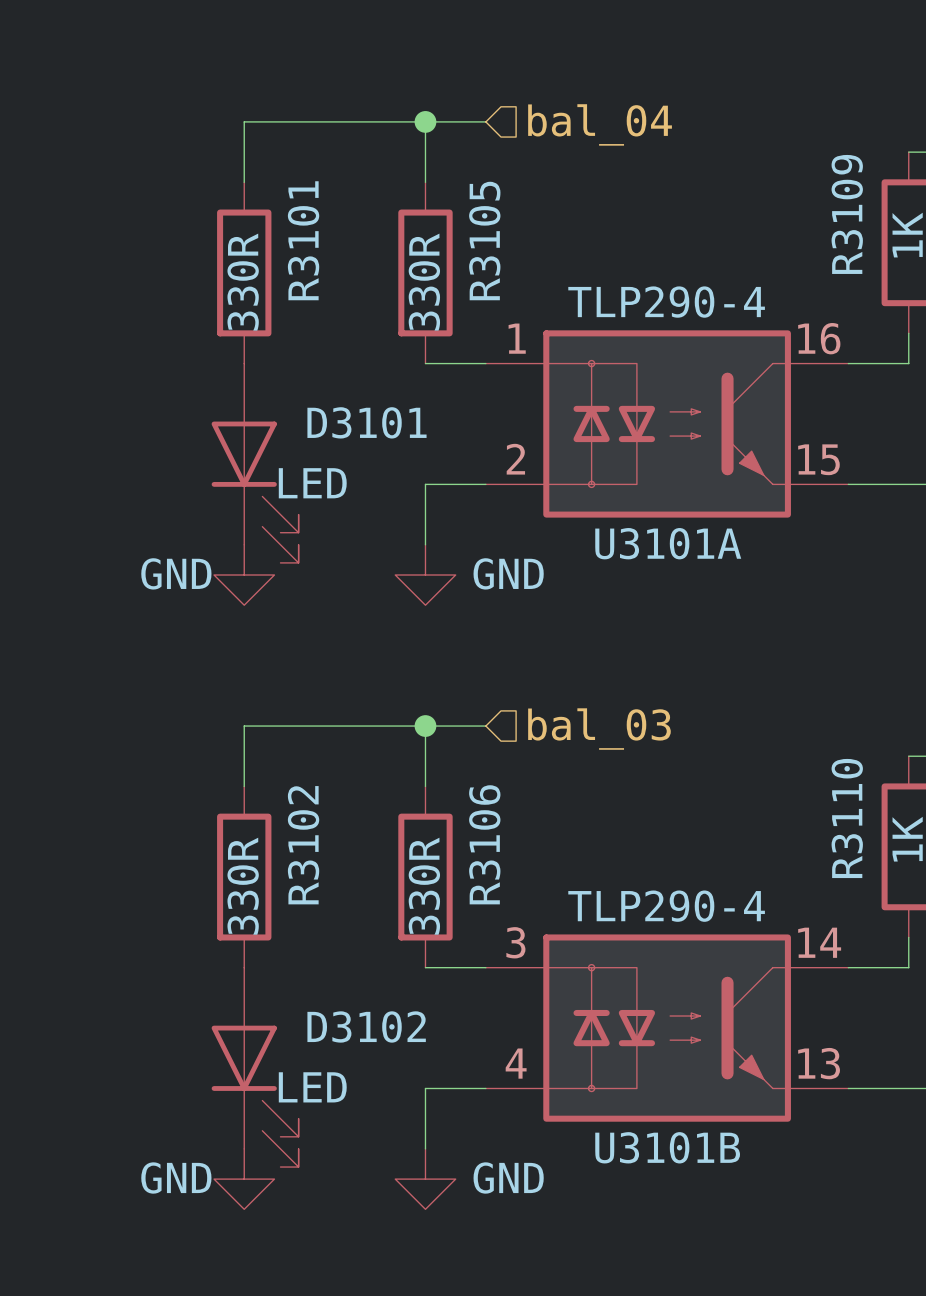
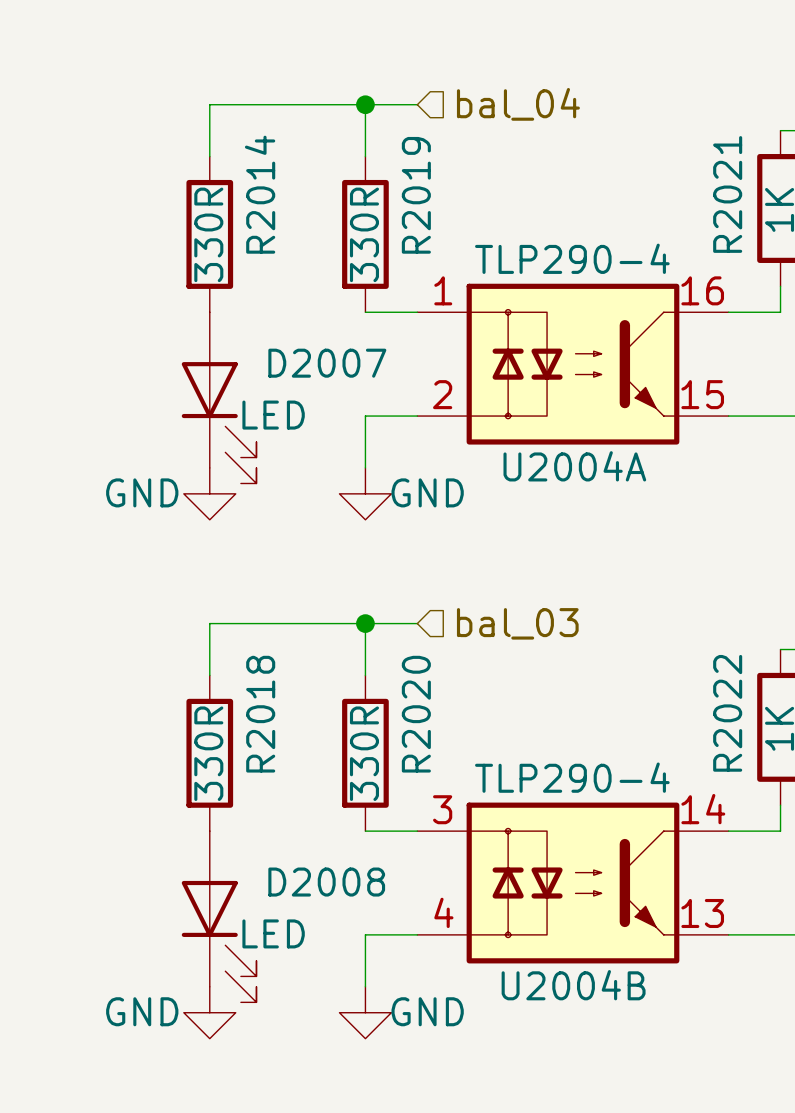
R3109 name: R3109 (847, 214) -> R2021 (727, 194)
R3101 name: R3101 (303, 240) -> R2014 (260, 194)
R3105 name: R3105 (484, 241) -> R2019 (416, 195)
D3101 name: D3101 (366, 422) -> D2007 (327, 363)
U3101A name: U3101A (668, 543) -> U2004A (574, 466)
R3110 name: R3110 (847, 818) -> R2022 (727, 713)
R3106 name: R3106 (484, 844) -> R2020 (416, 714)
R3102 name: R3102 (303, 845) -> R2018 (260, 714)
D3102 name: D3102 (366, 1026) -> D2008 (326, 882)
U3101B name: U3101B (667, 1147) -> U2004B (573, 985)

